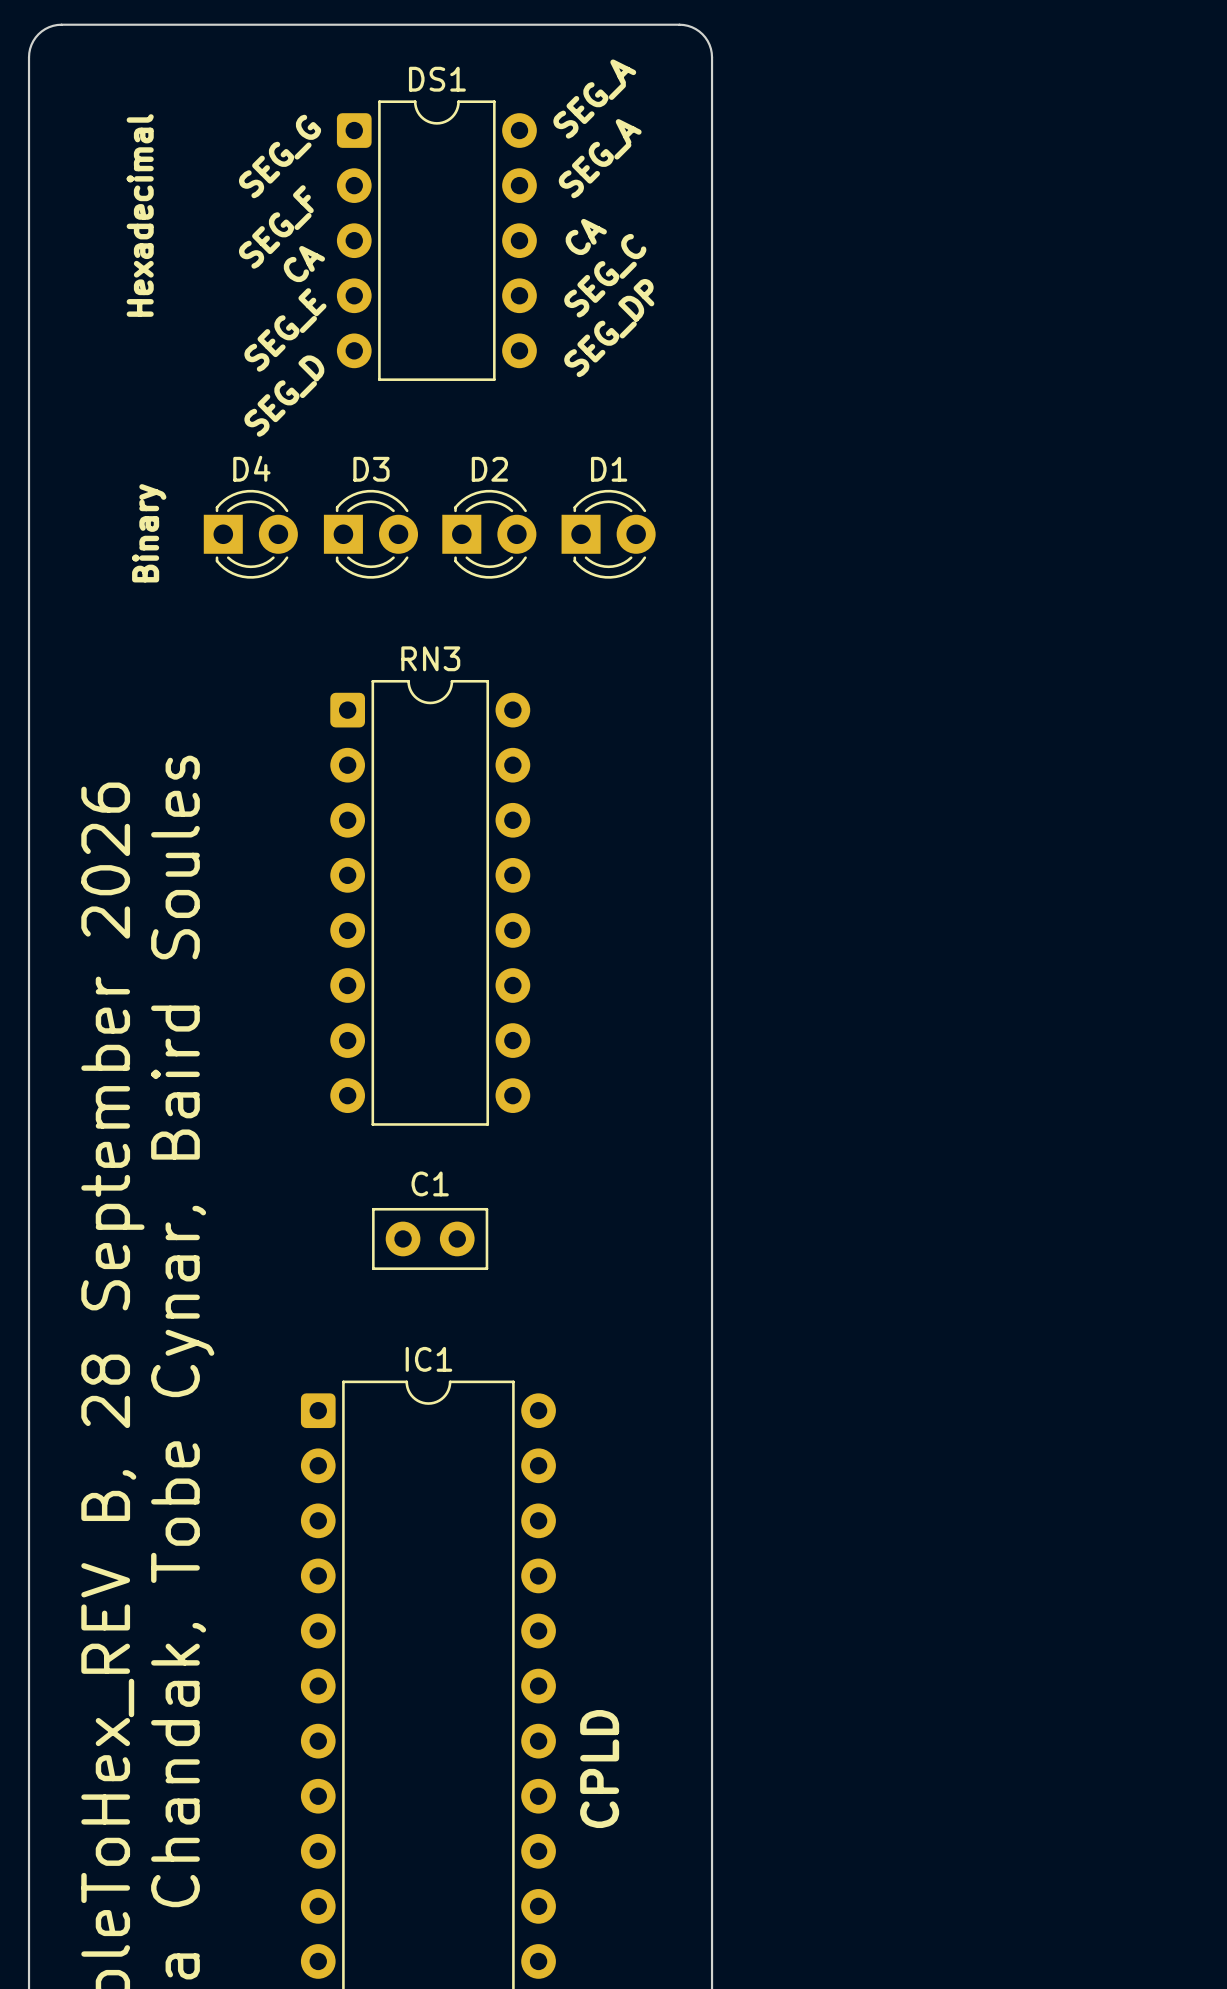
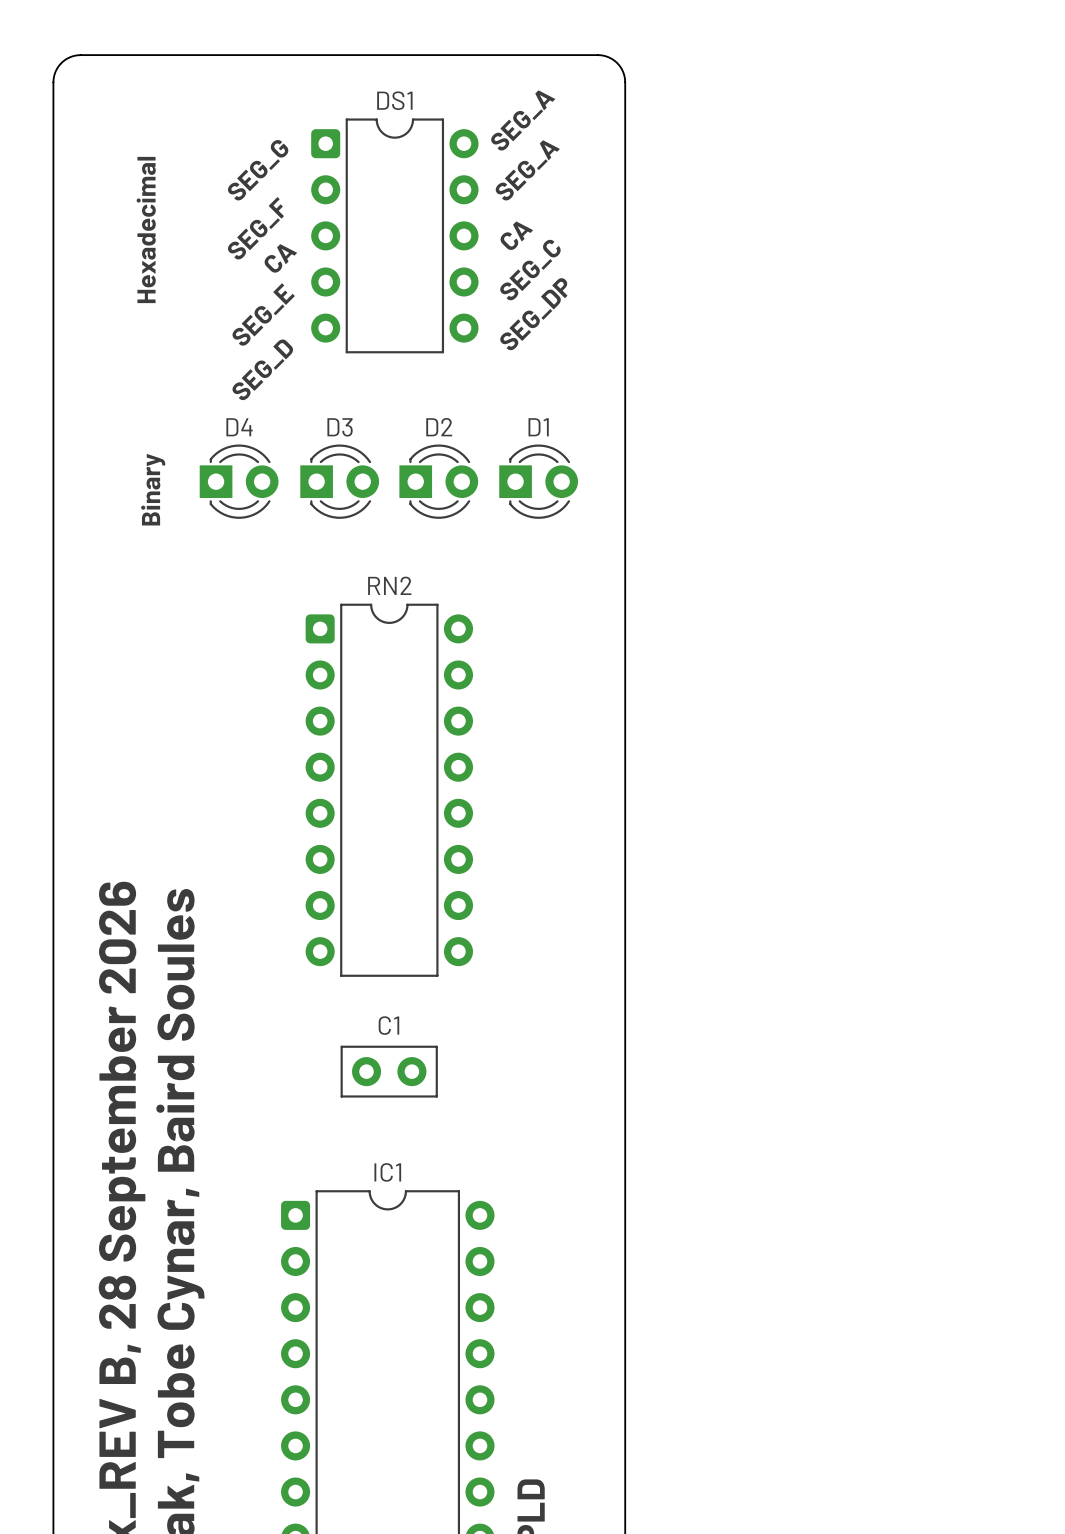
RN3 name: RN3 (430, 658) -> RN2 (389, 585)

